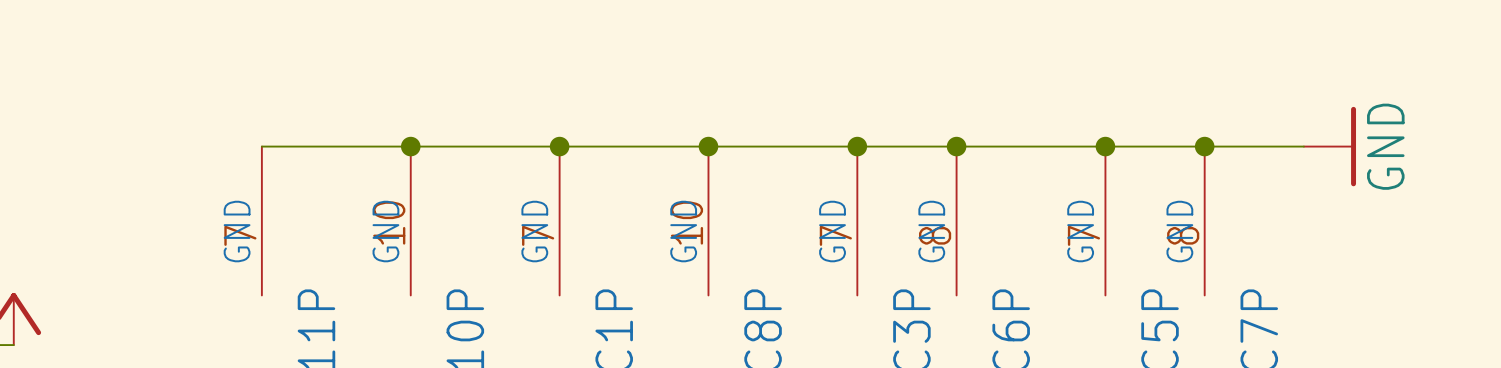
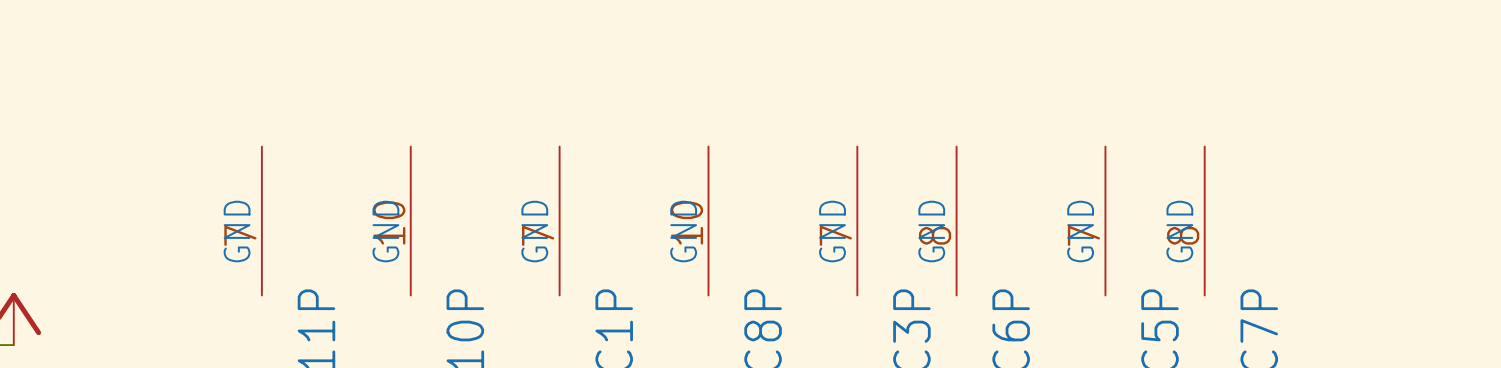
wire: (261, 146) (1303, 146) -> none
junction: (410, 146) -> none
junction: (559, 146) -> none
junction: (708, 146) -> none
junction: (857, 146) -> none
junction: (956, 146) -> none
junction: (1105, 146) -> none
junction: (1204, 146) -> none
power symbol: GND (1329, 146) -> none

